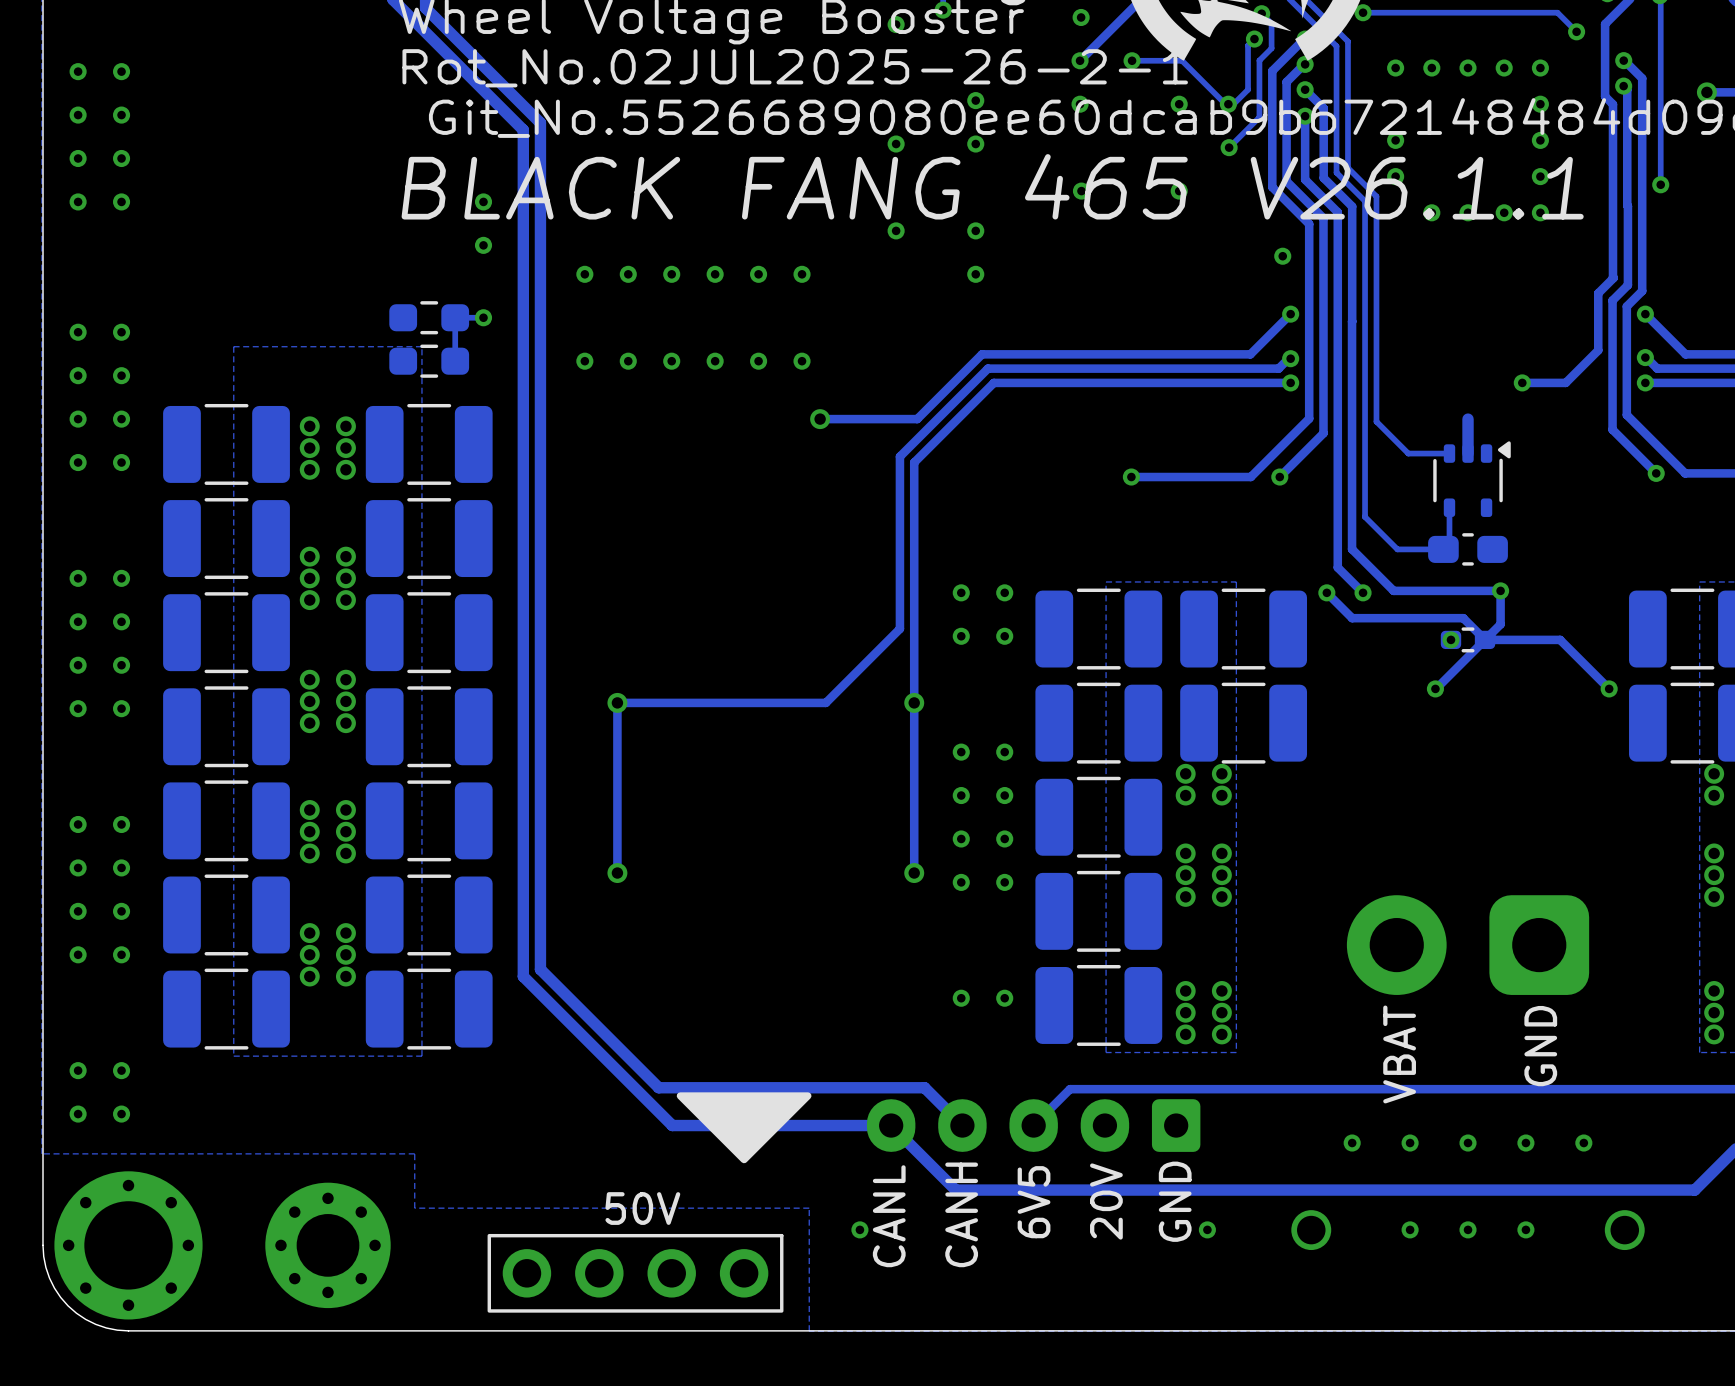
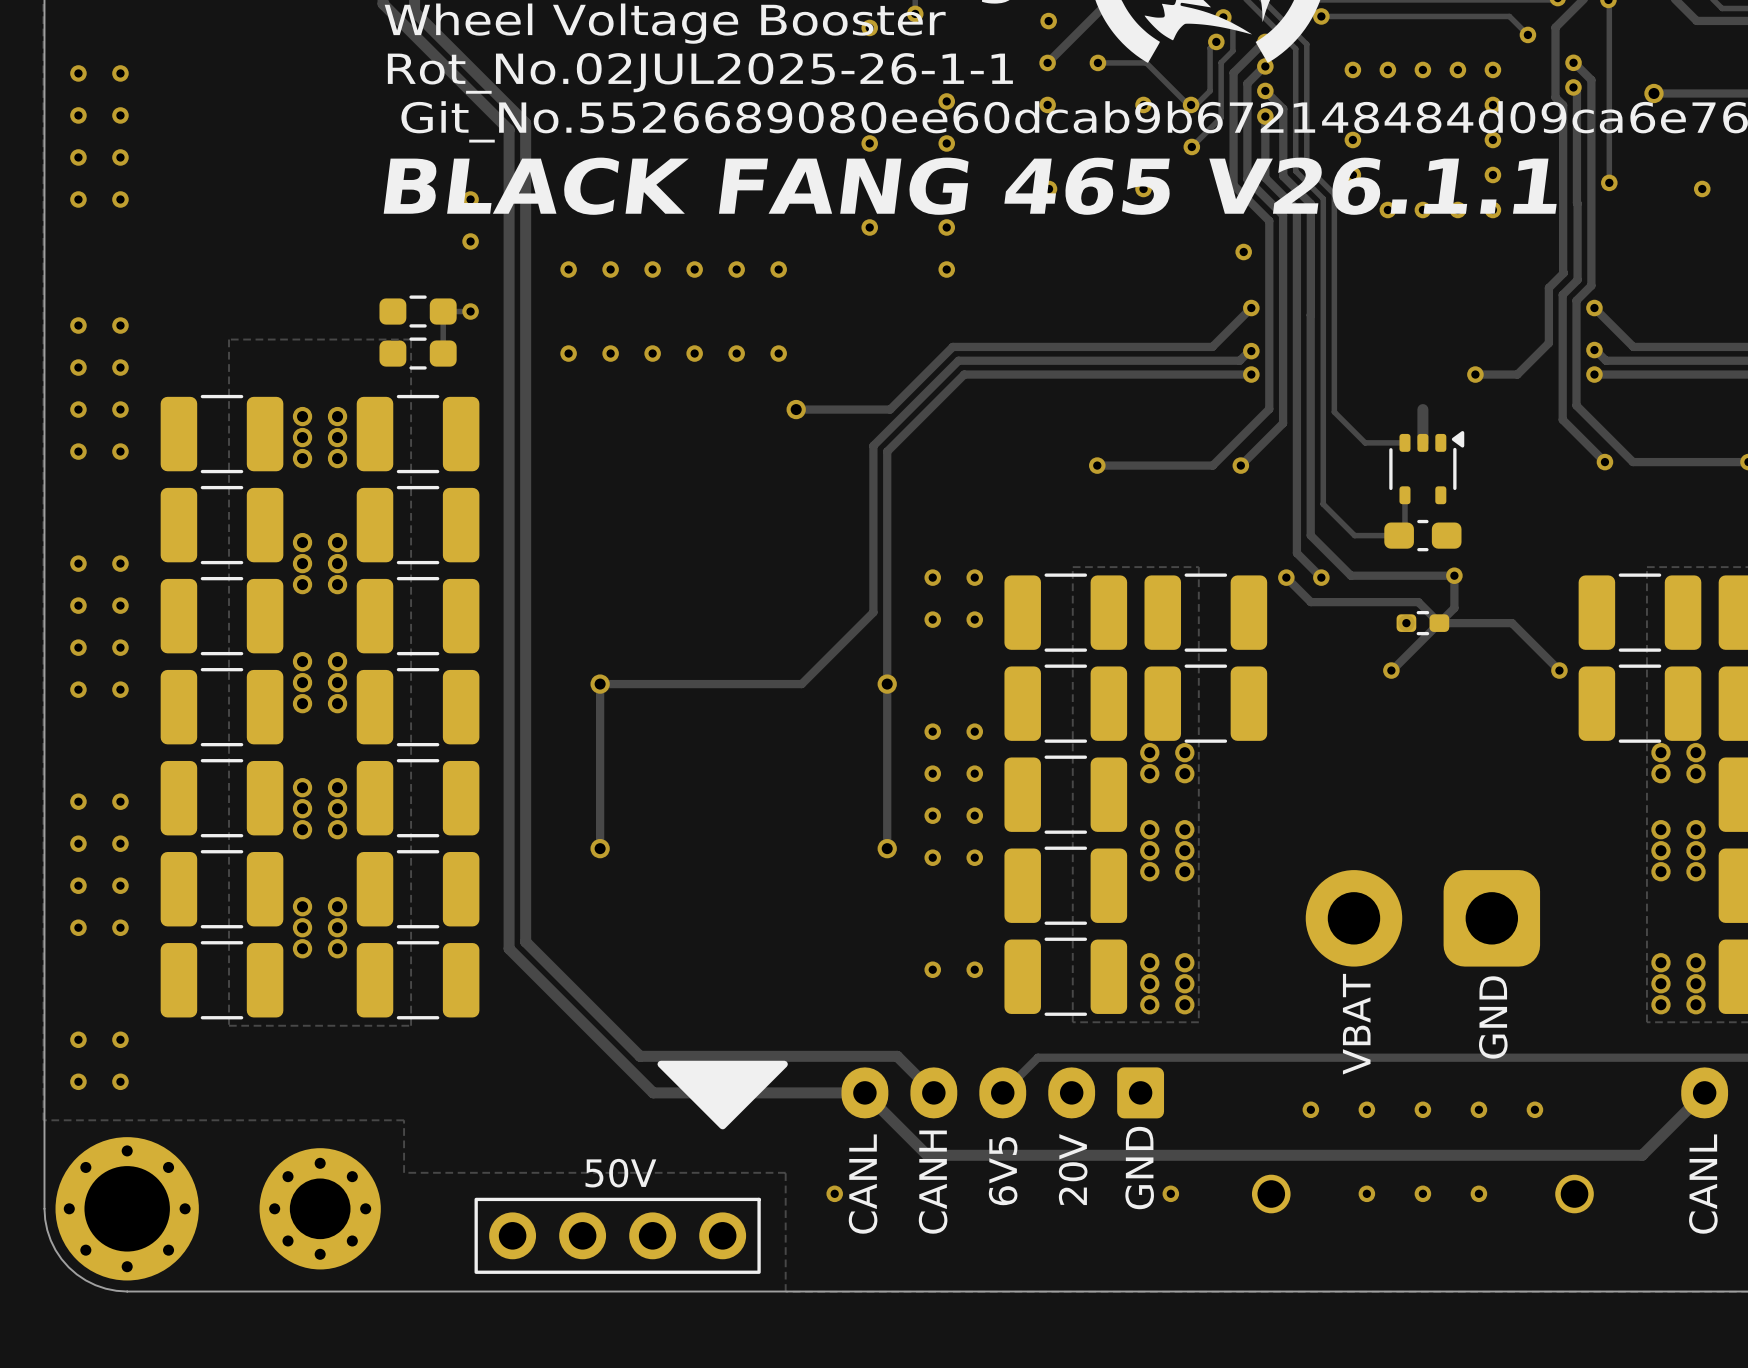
text: Rot_No.02JUL2025-26-2-1 (795, 68) -> Rot_No.02JUL2025-26-1-1 (700, 73)

